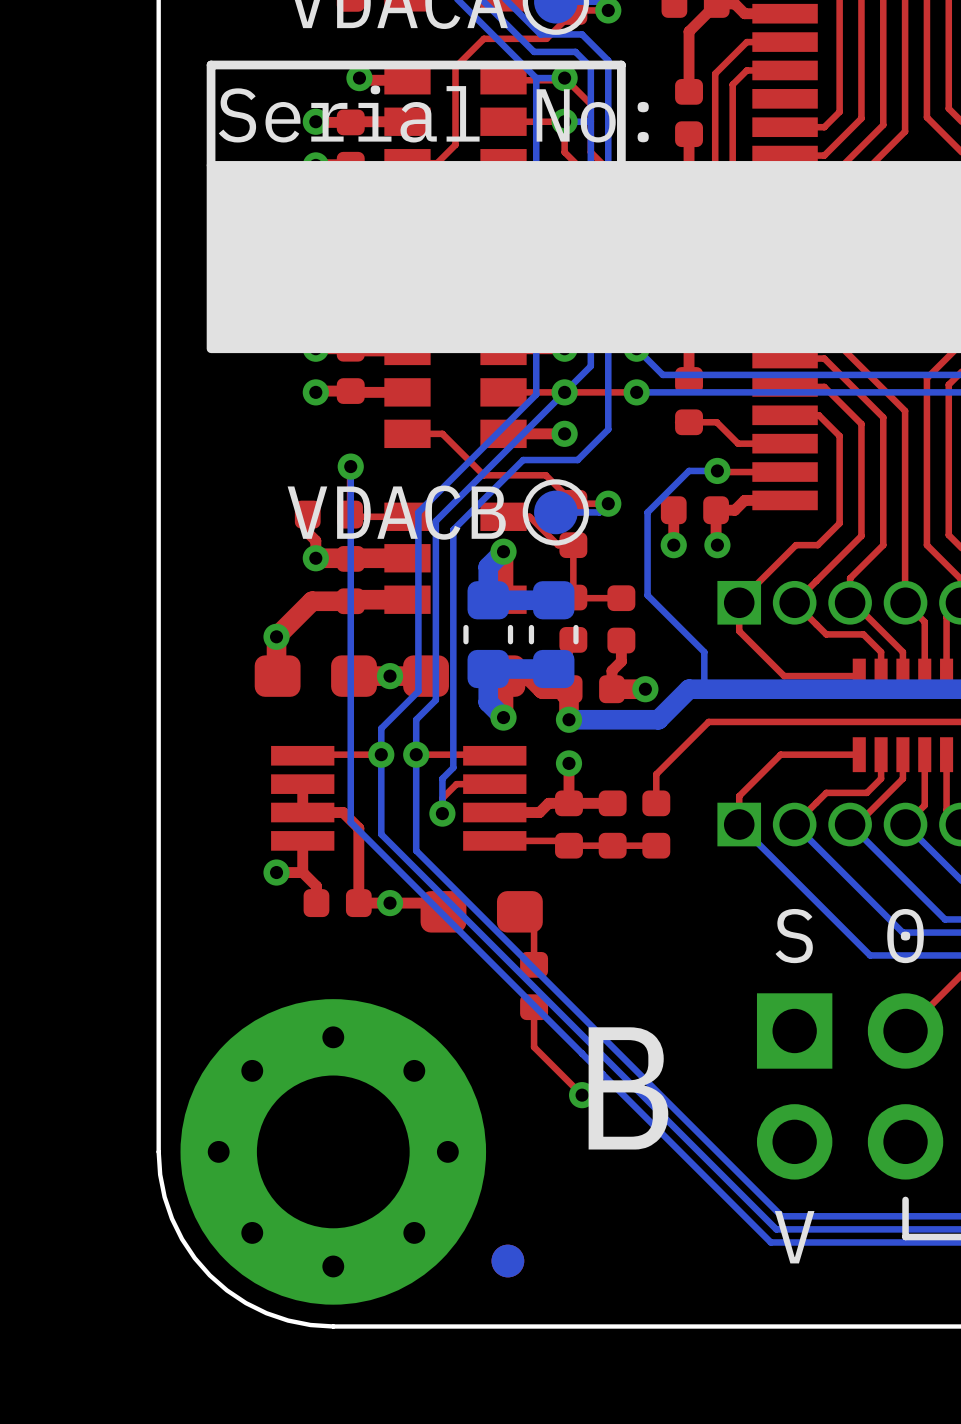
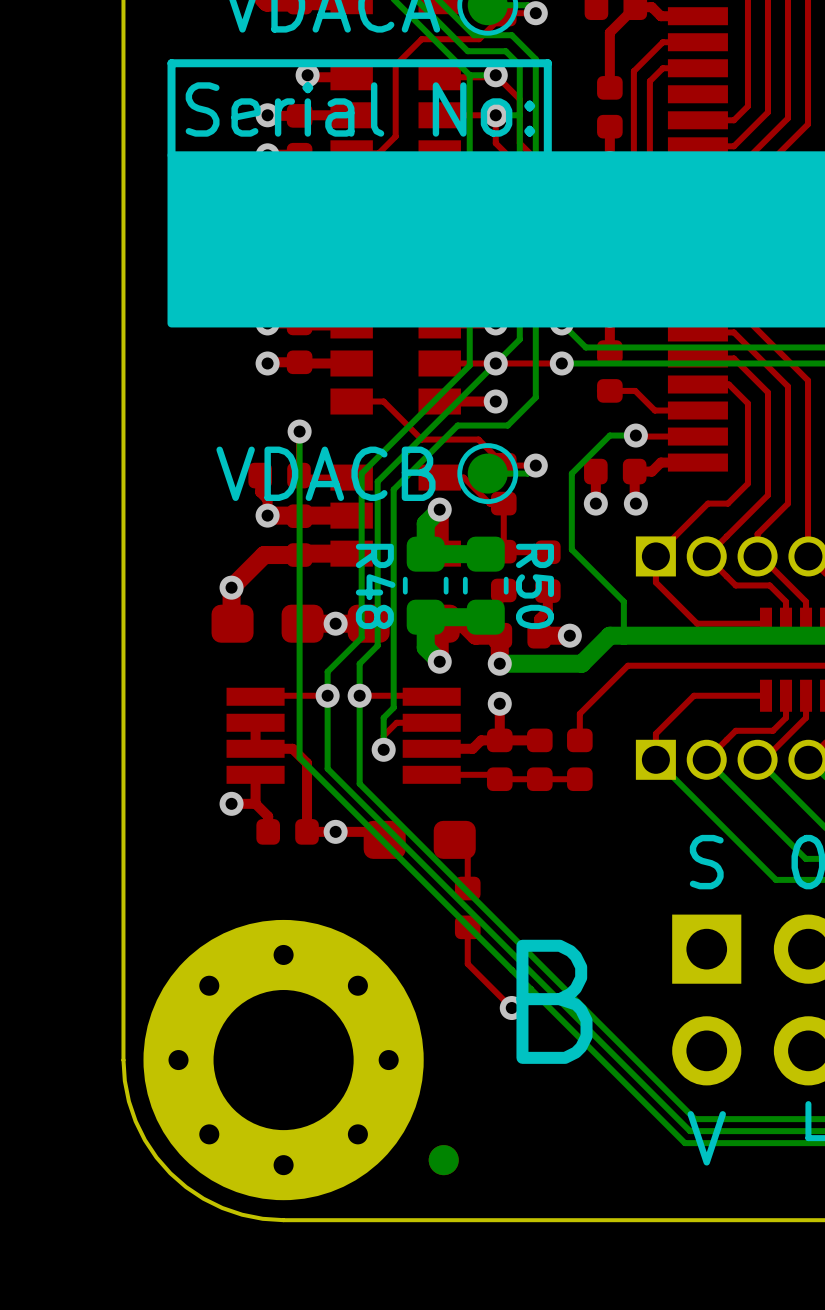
R48 name: none -> R48 (375, 586)
R50 name: none -> R50 (535, 586)

